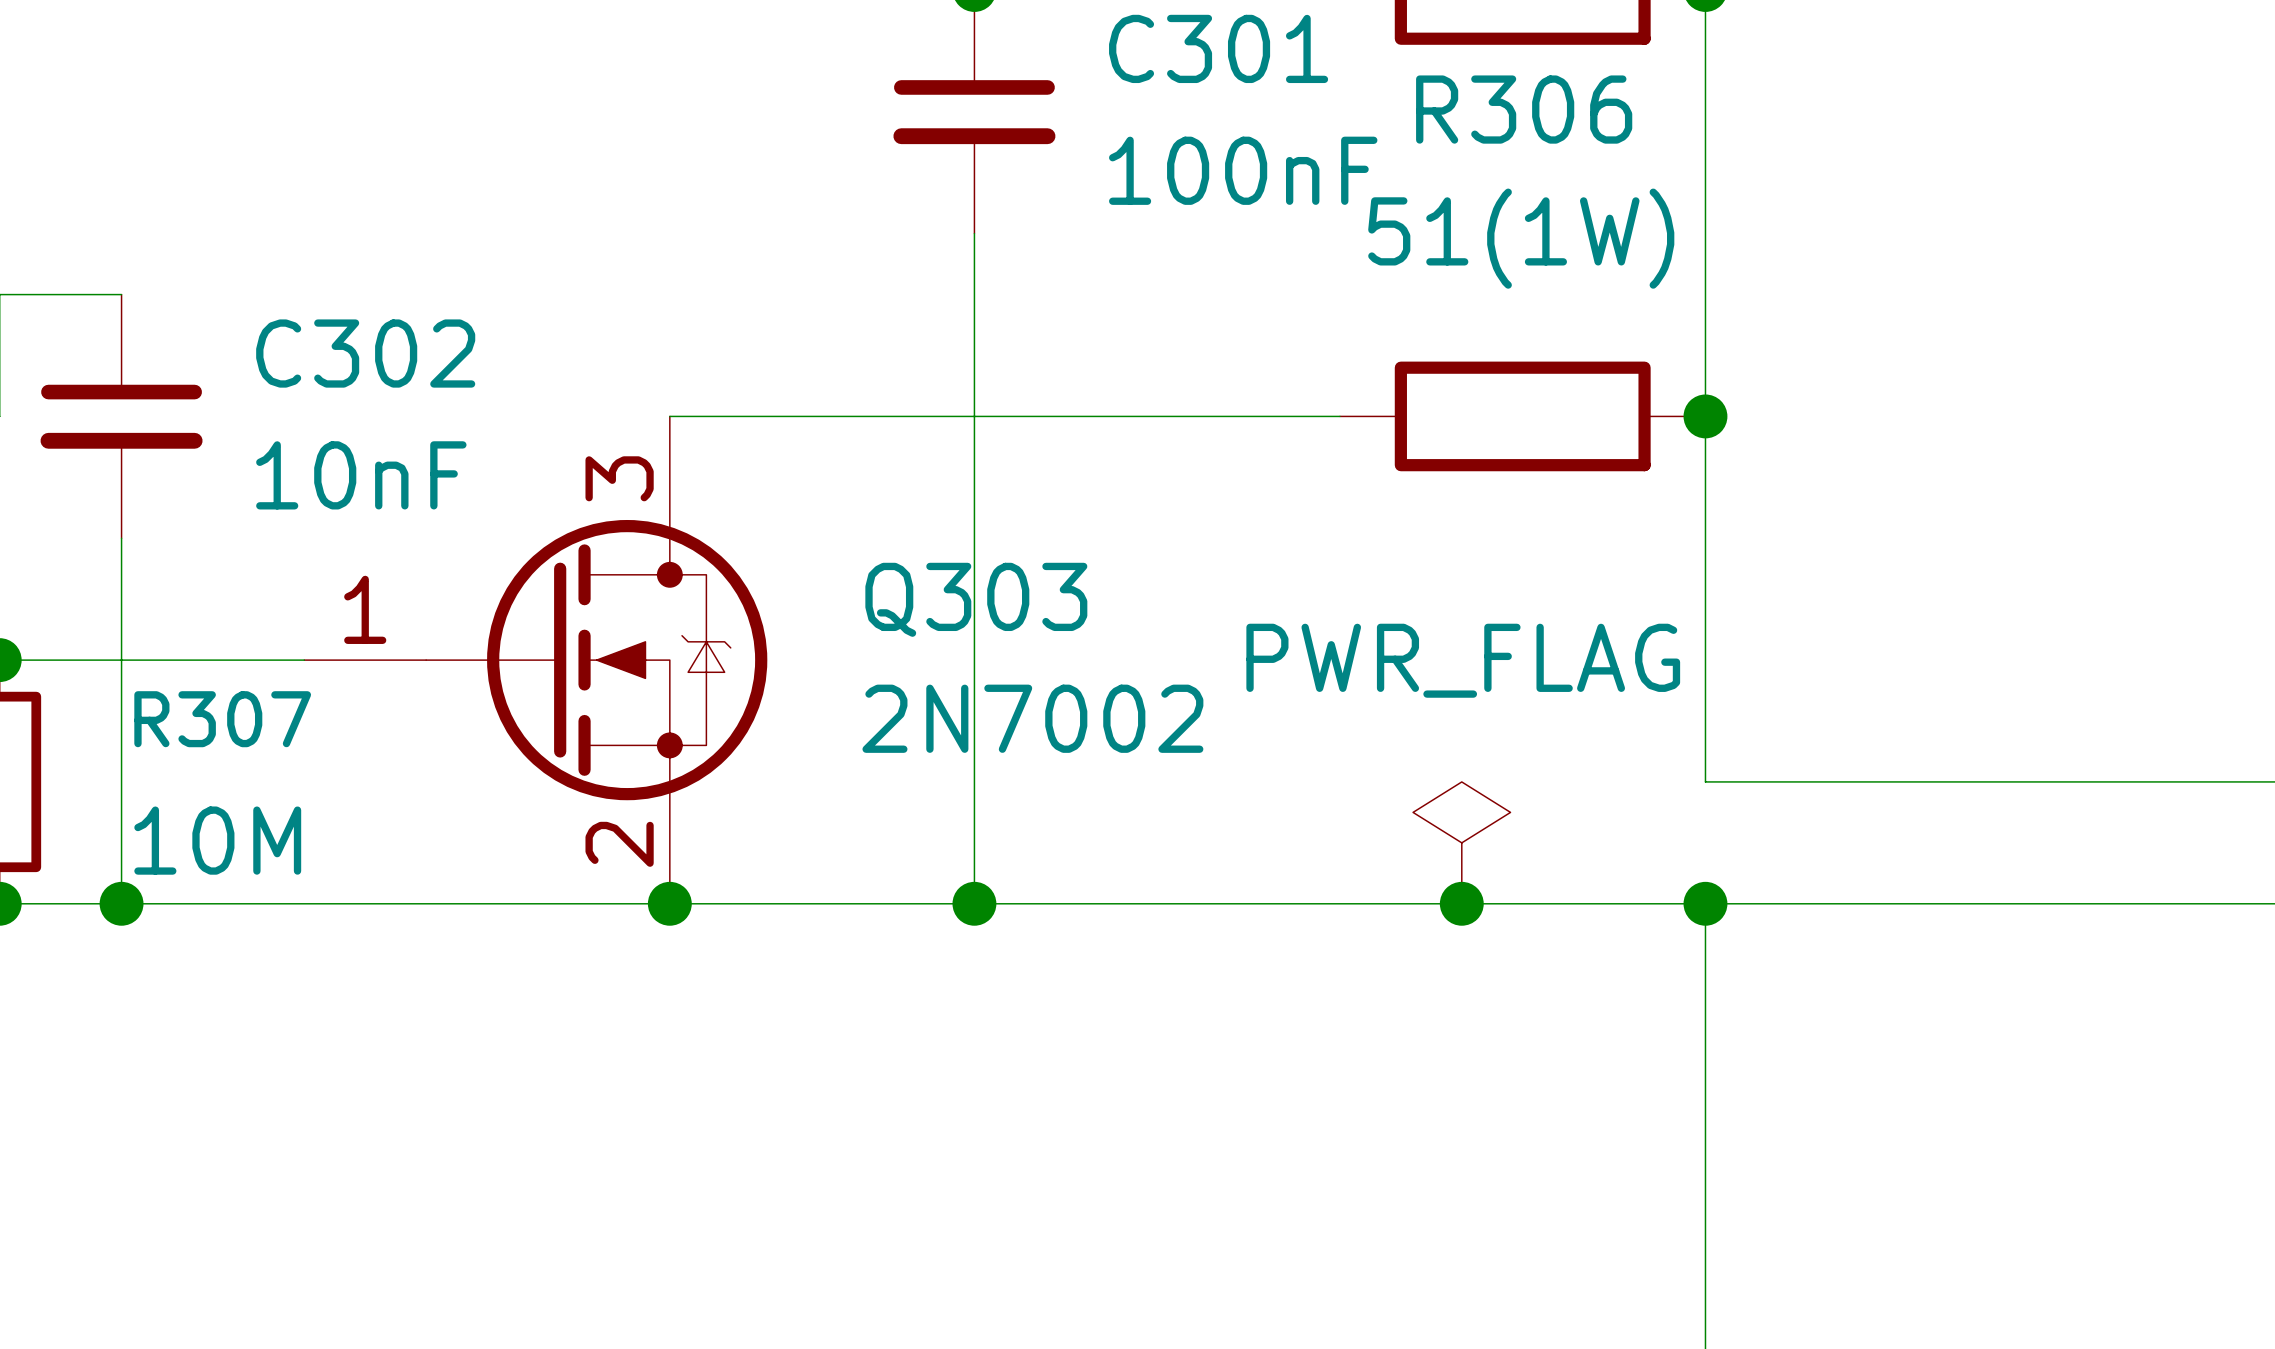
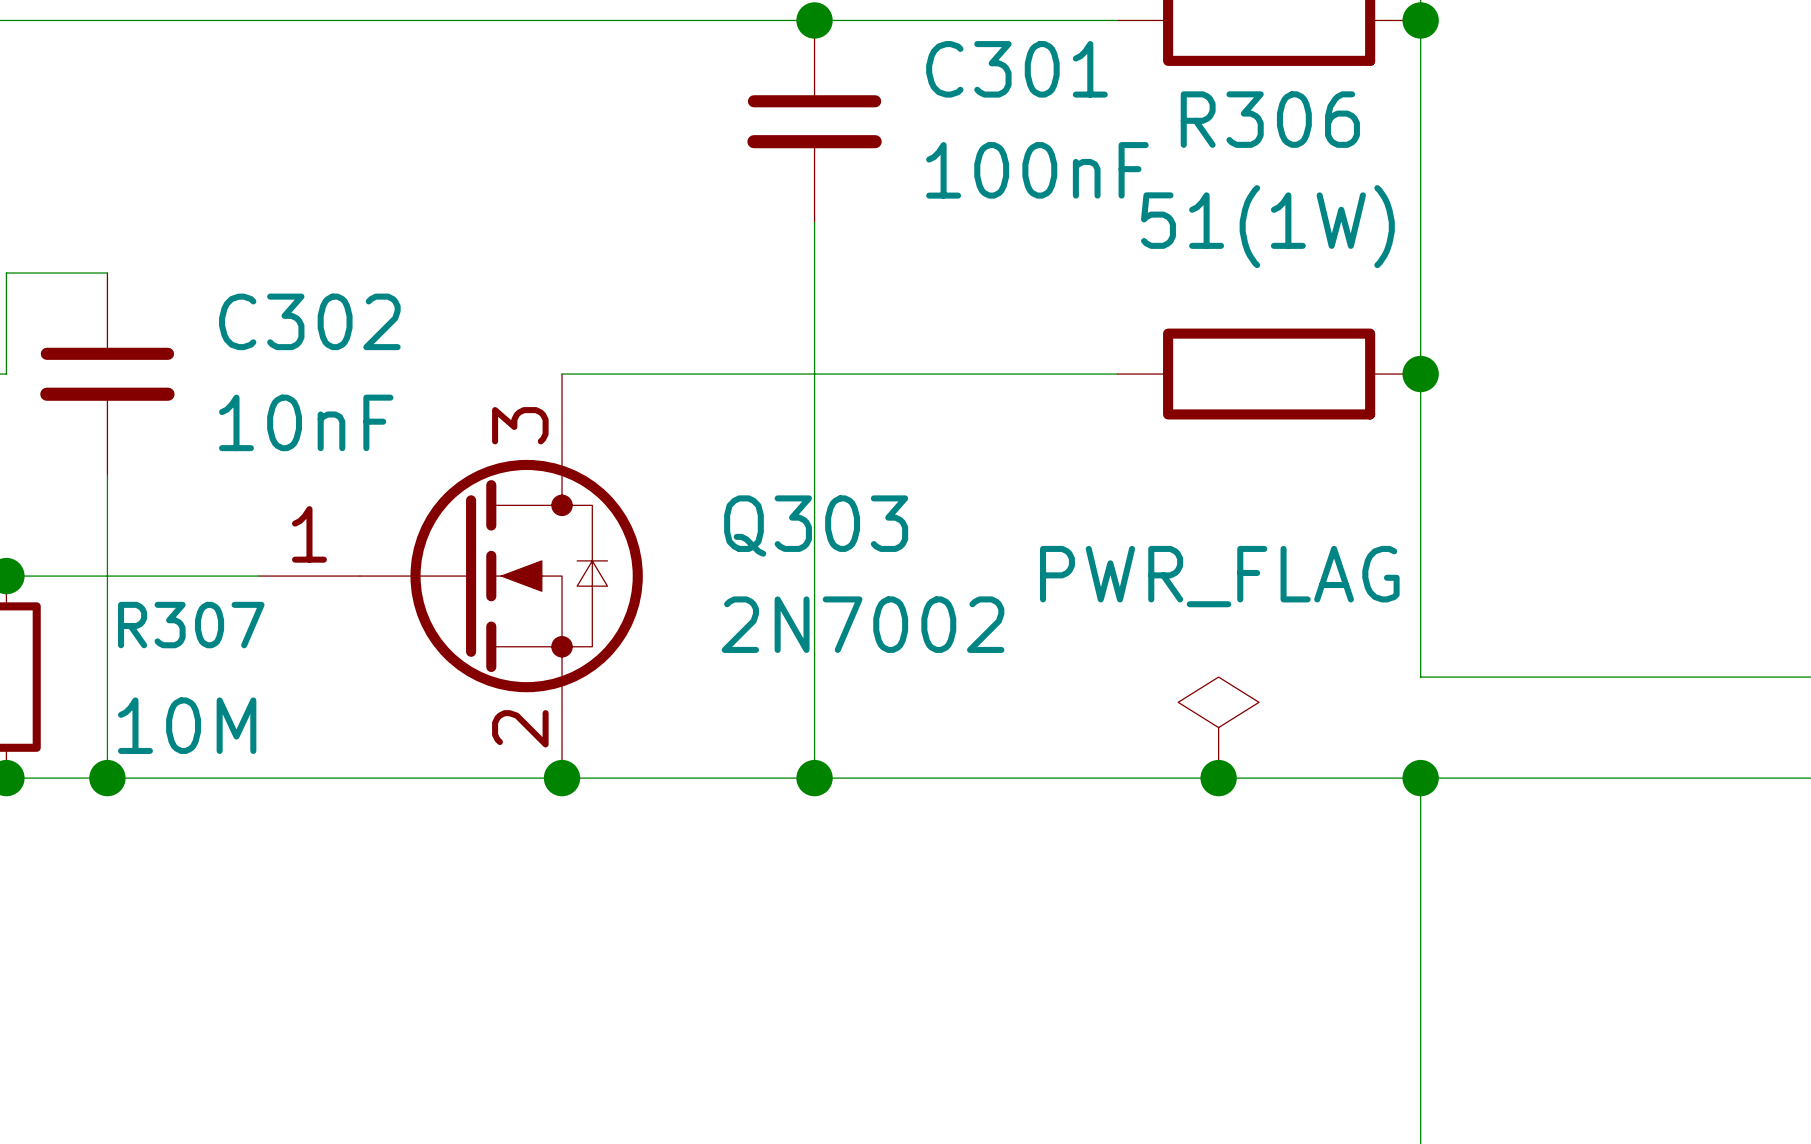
Q303 symbol: [304, 416, 768, 904] -> [258, 374, 643, 779]

